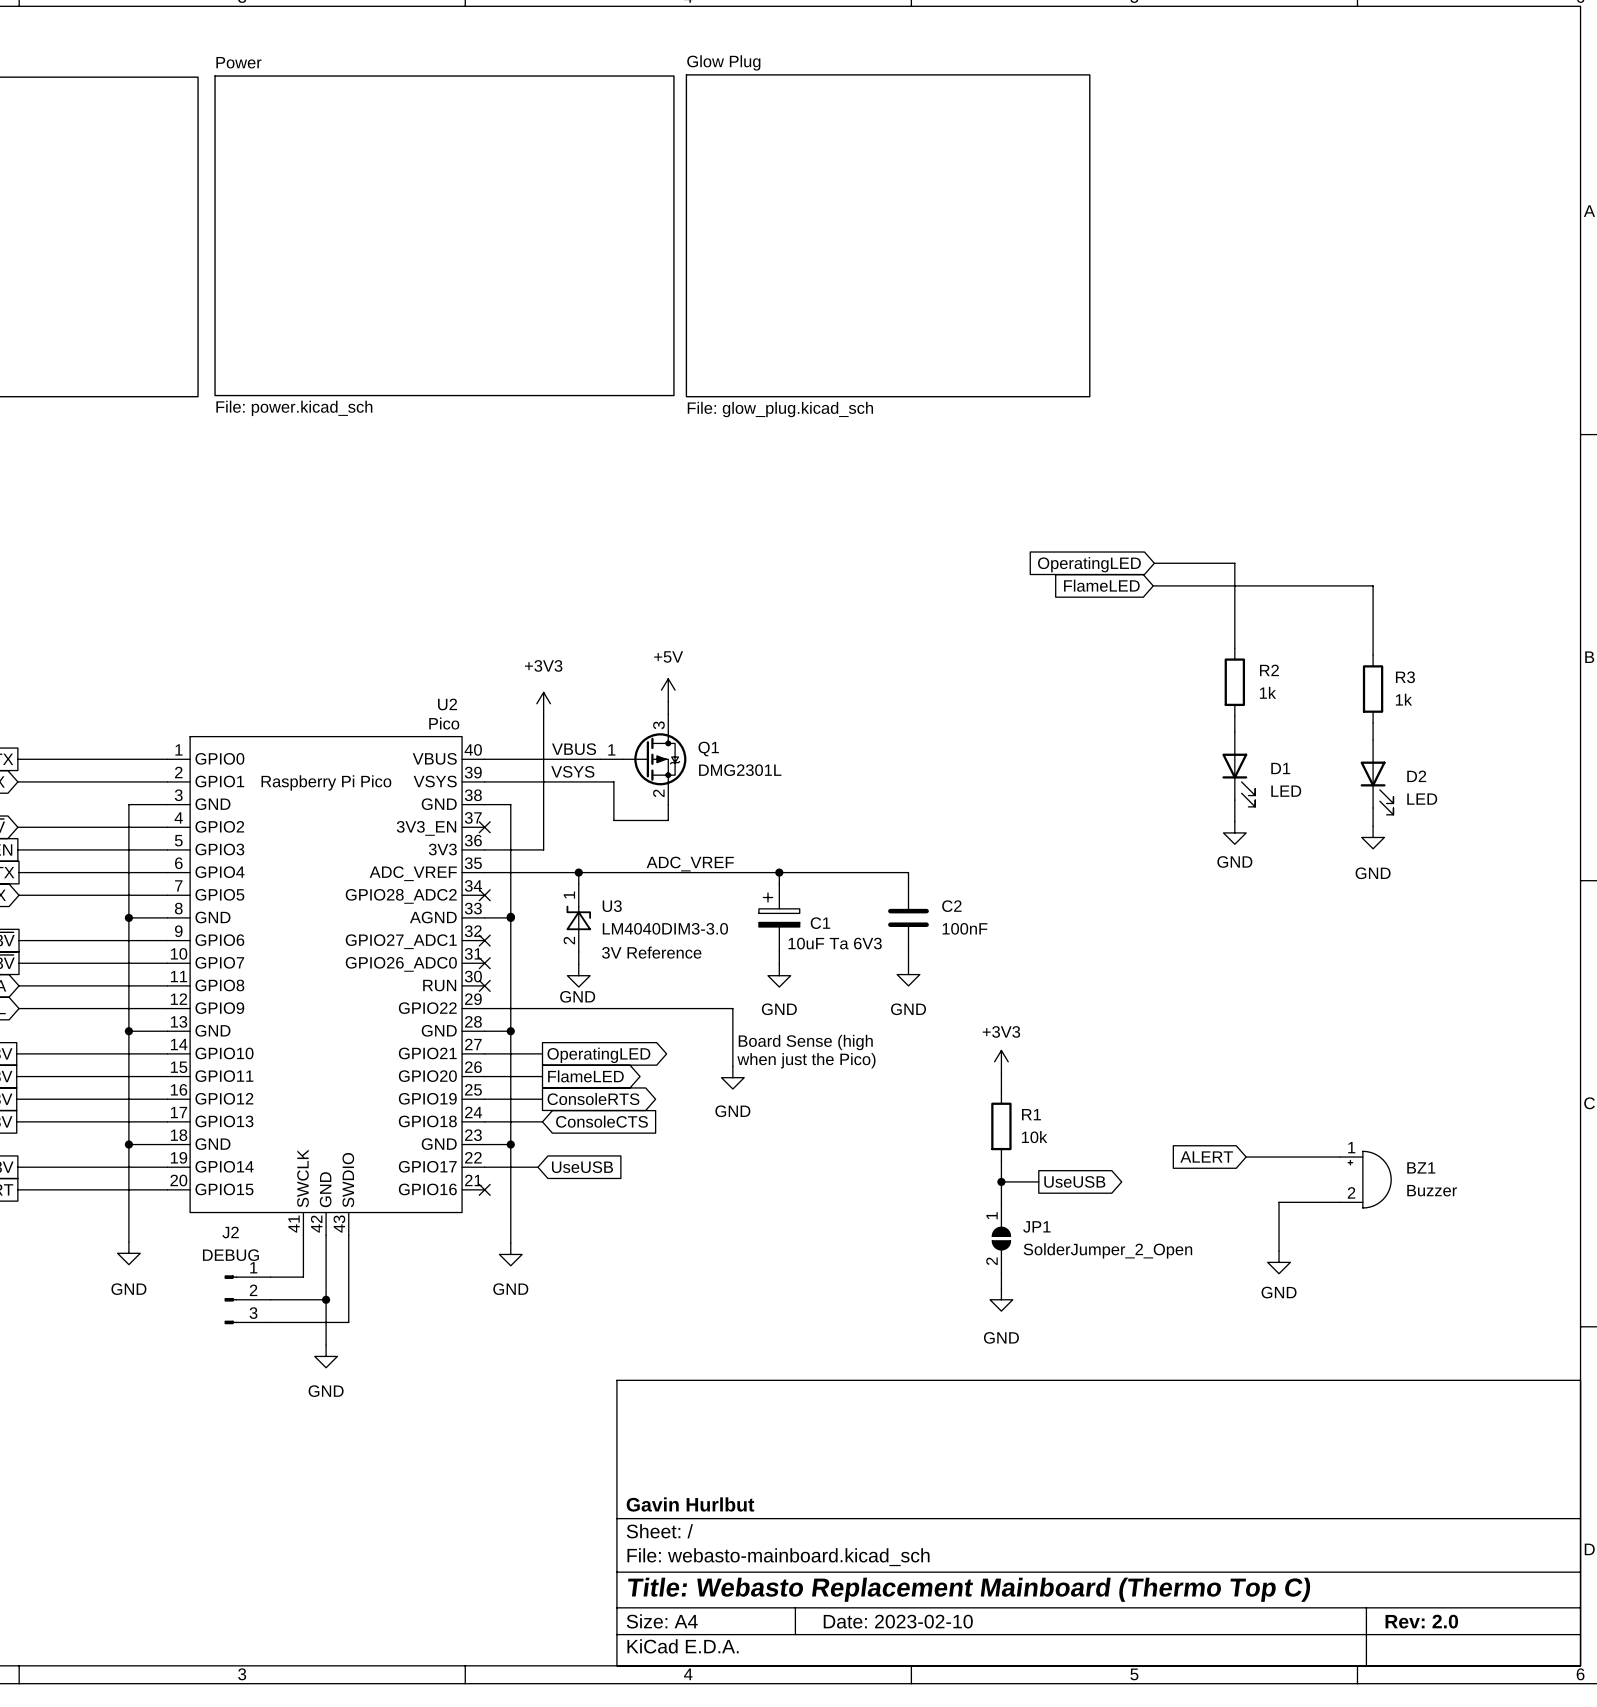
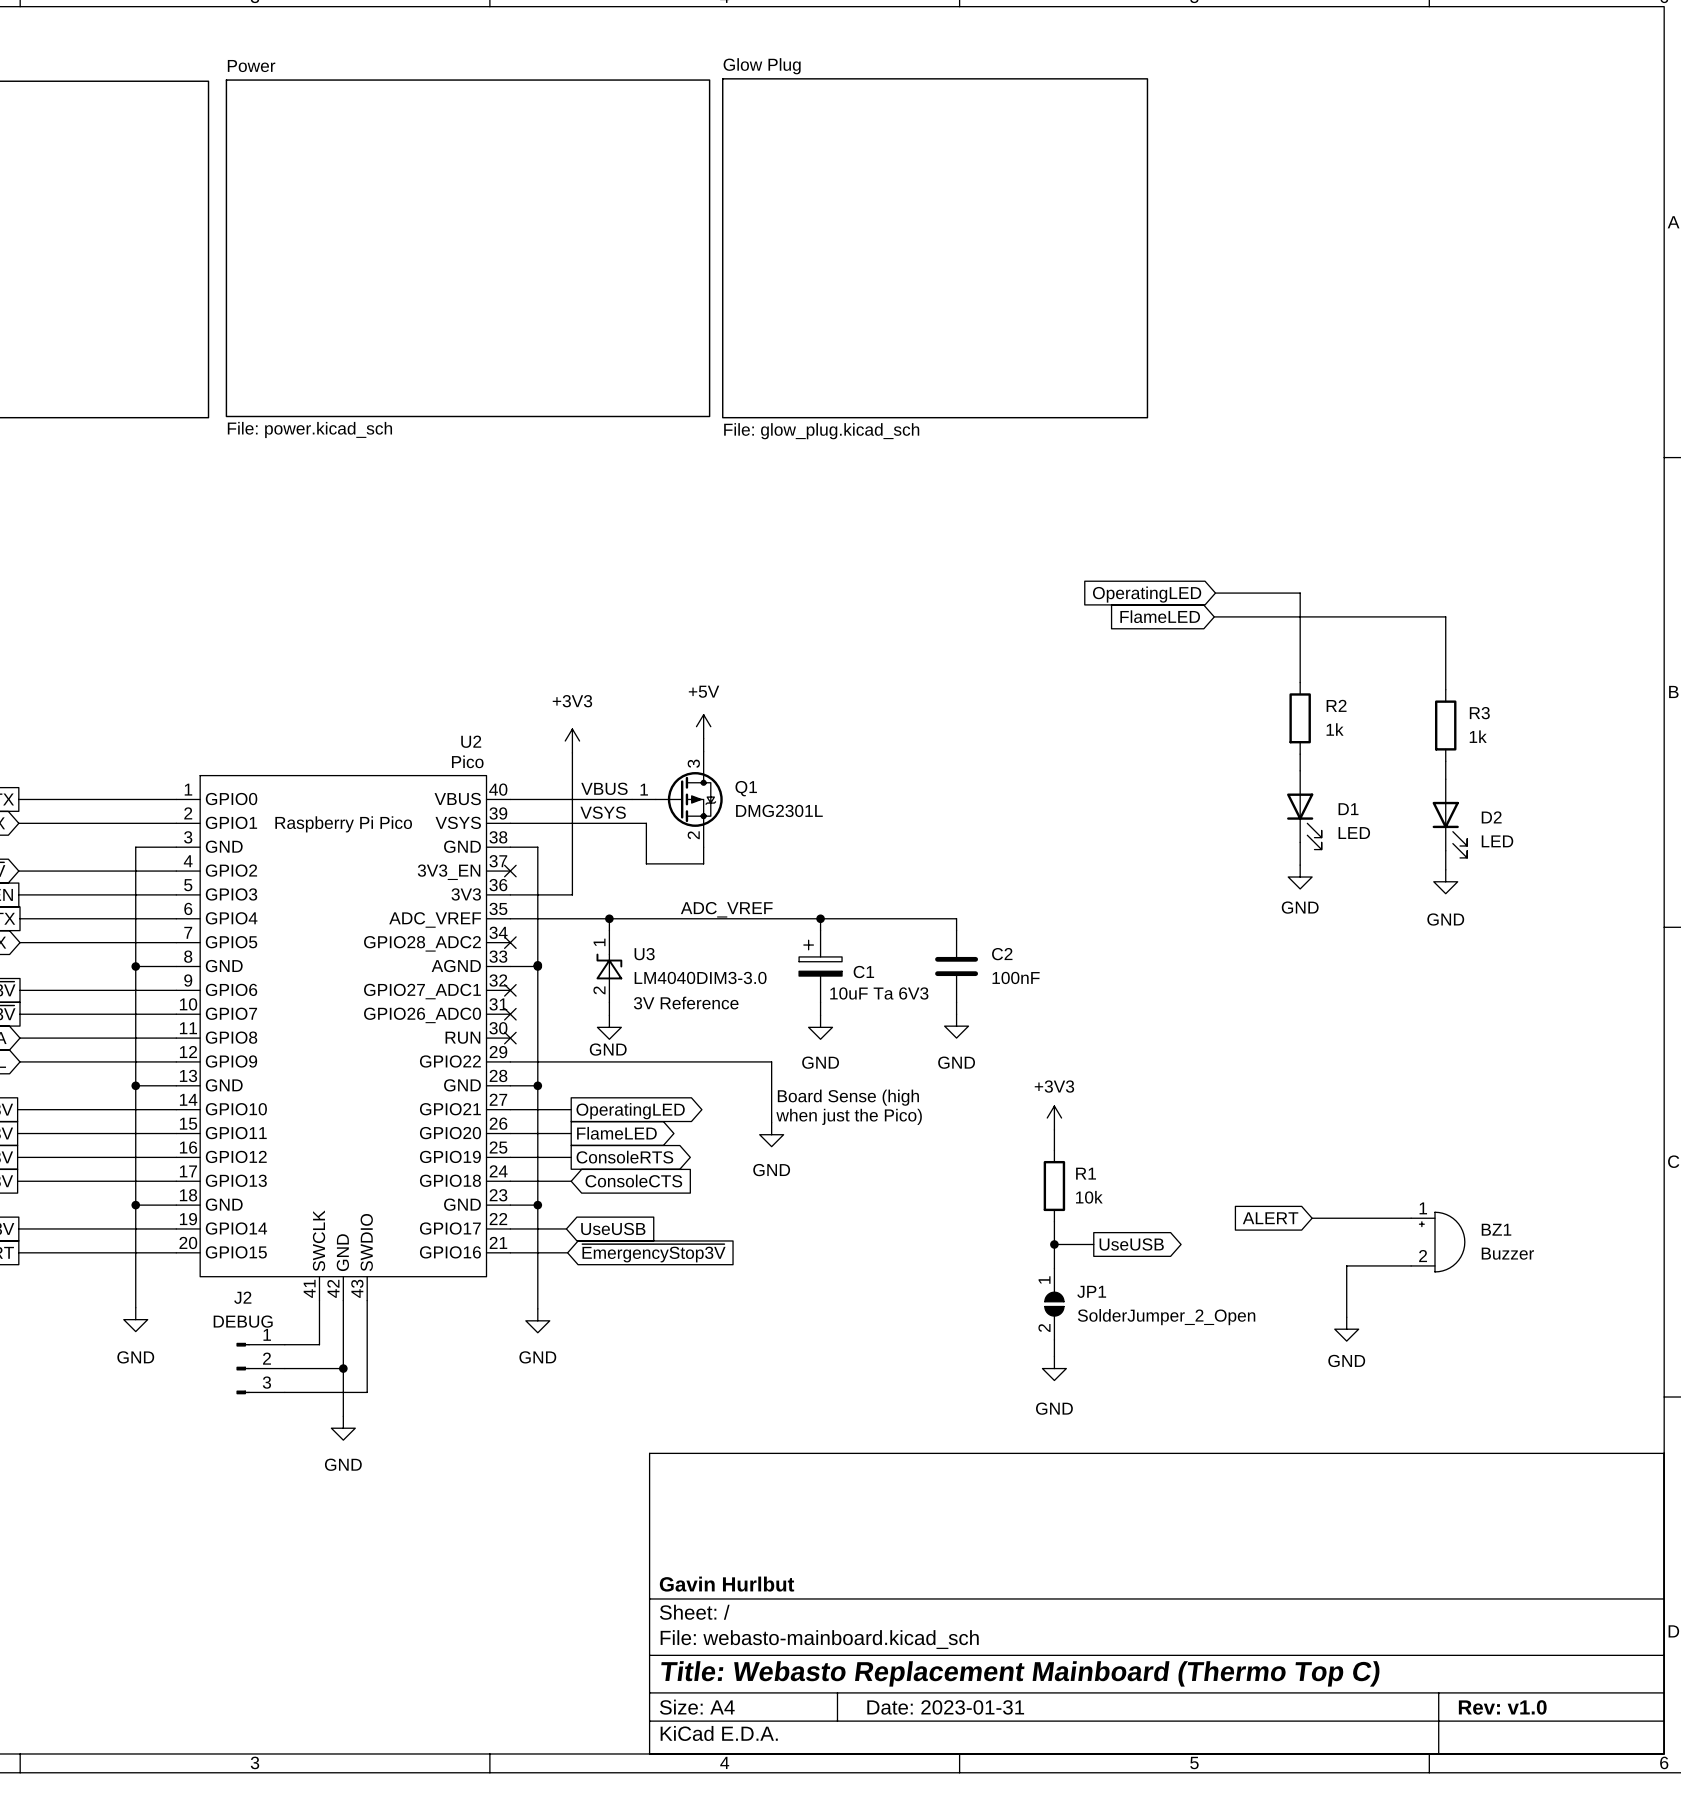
wire: none -> (510, 1252) (567, 1252)
no-connect mark: (484, 1189) -> none
global label: none -> ~{EmergencyStop3V} (653, 1253)
title block: Date: 2023-02-10 (898, 1621) -> Date: 2023-01-31 (945, 1707)
title block: Rev: 2.0 (1421, 1621) -> Rev: v1.0 (1502, 1707)

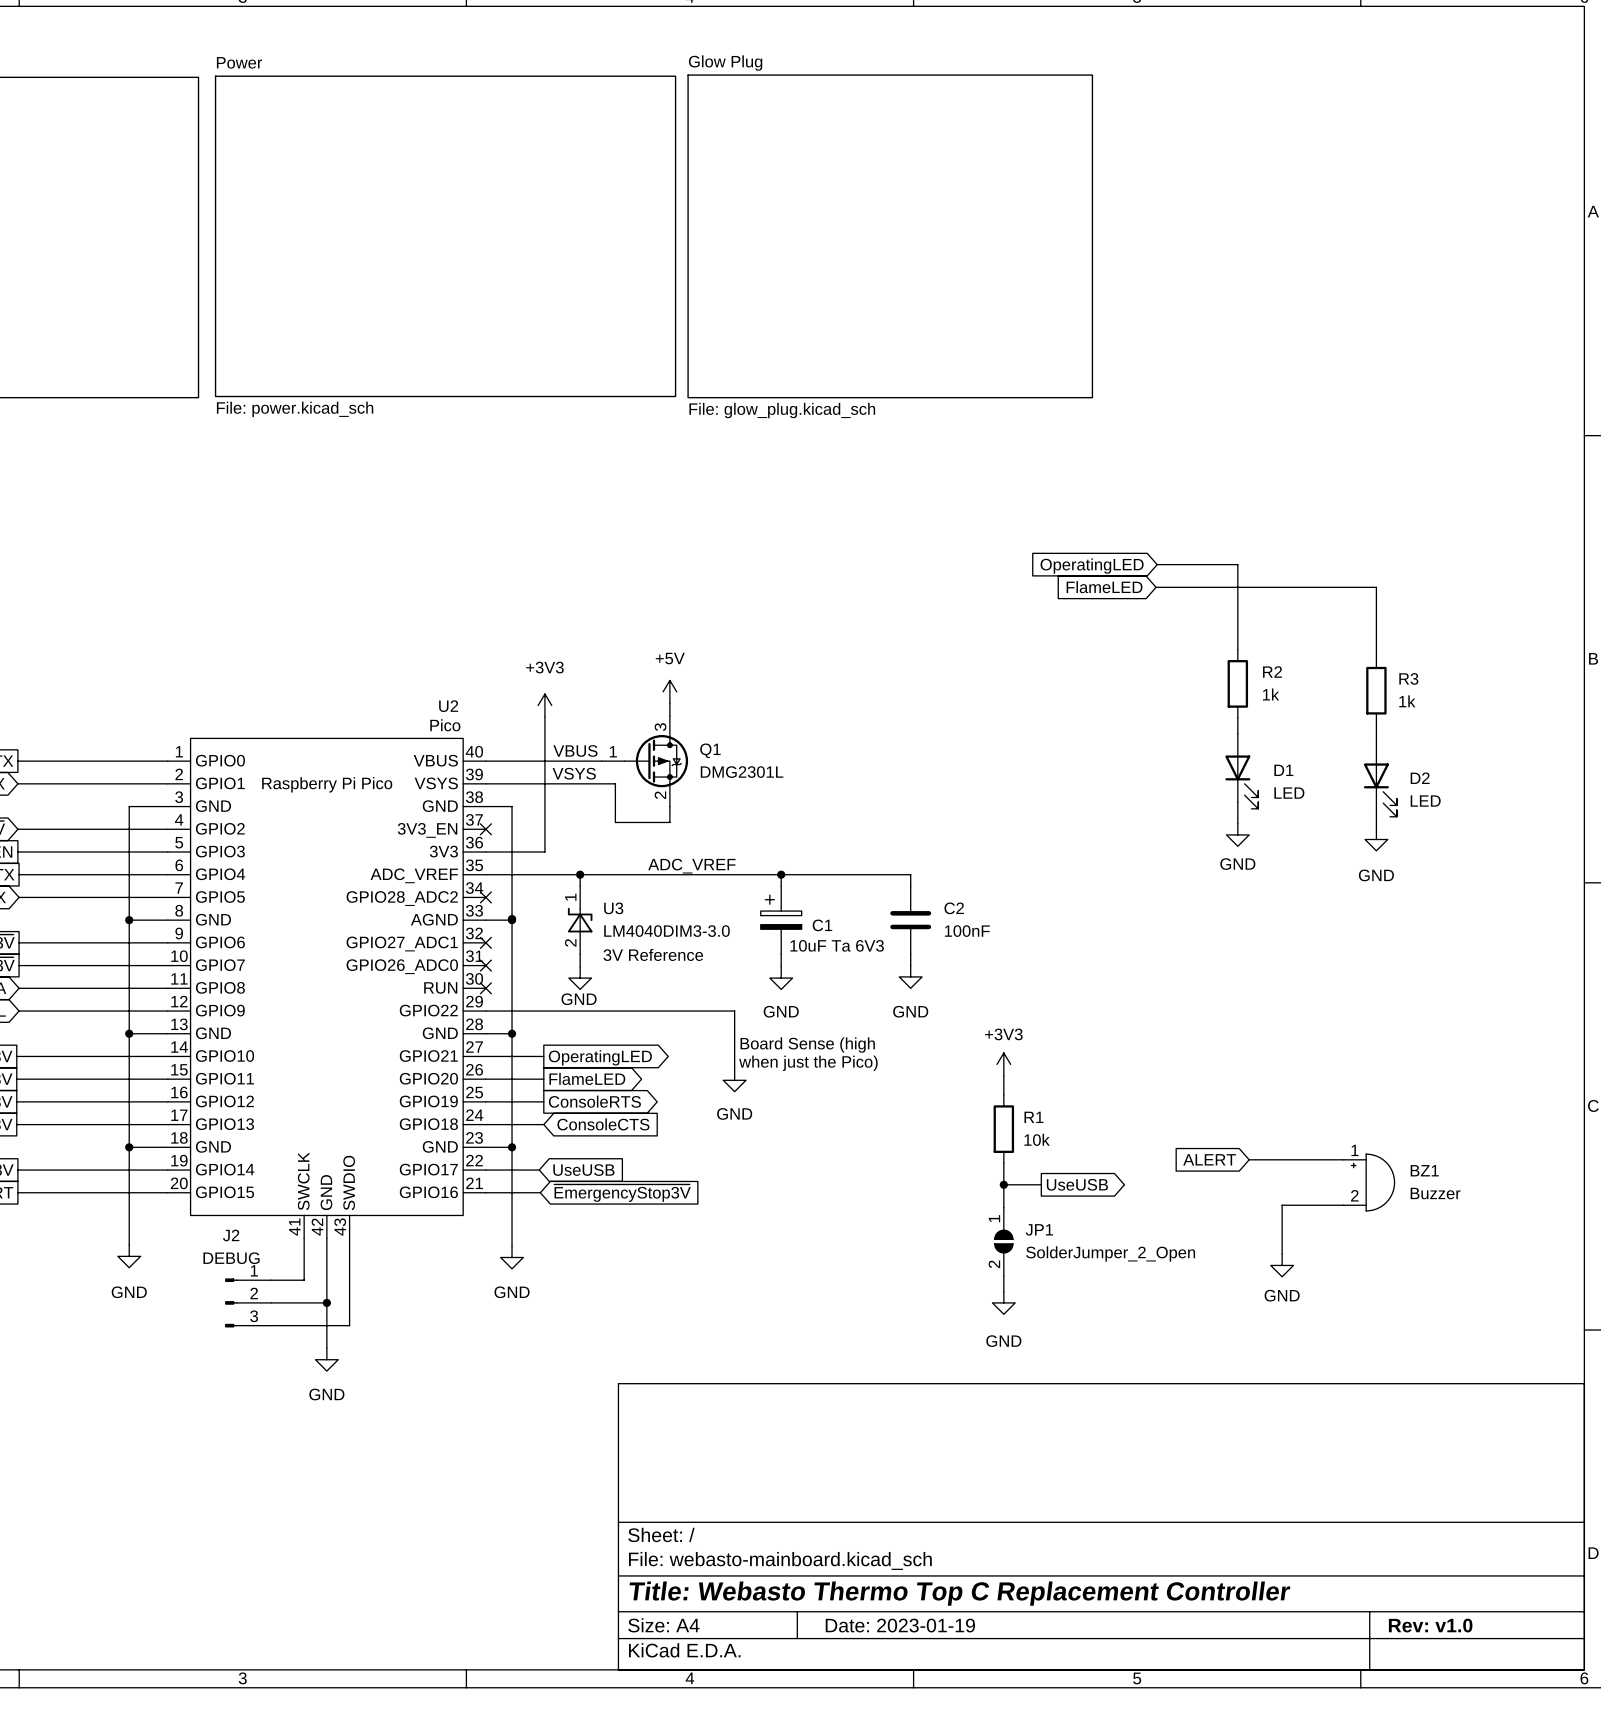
title block: Gavin Hurlbut (726, 1584) -> none
title block: Title: Webasto Replacement Mainboard (Thermo Top C) (1020, 1673) -> Title: Webasto Thermo Top C Replacement Controller (959, 1593)
title block: Date: 2023-01-31 (945, 1707) -> Date: 2023-01-19 (900, 1625)

